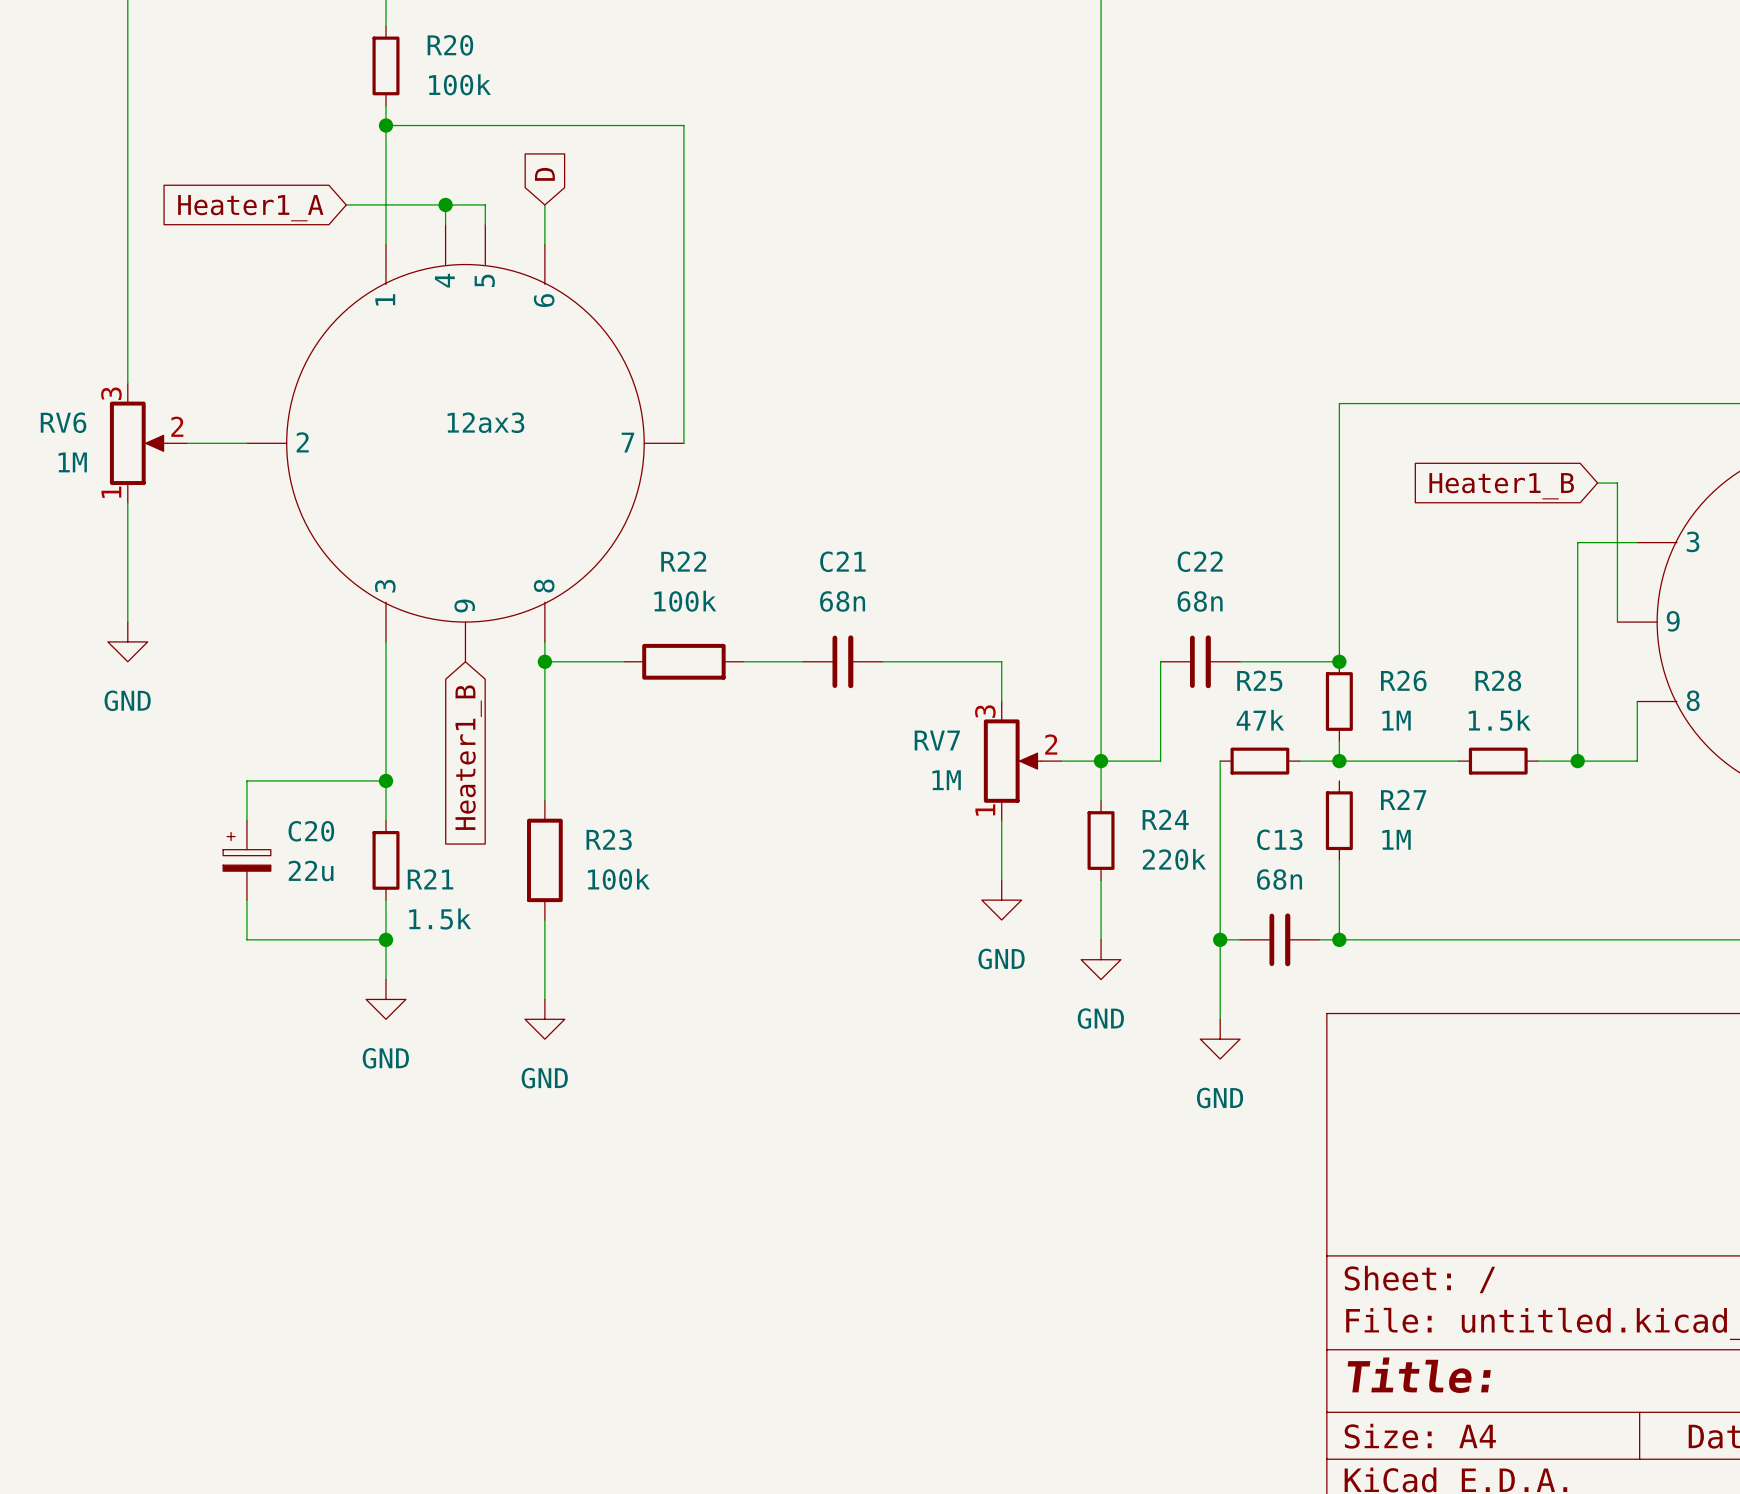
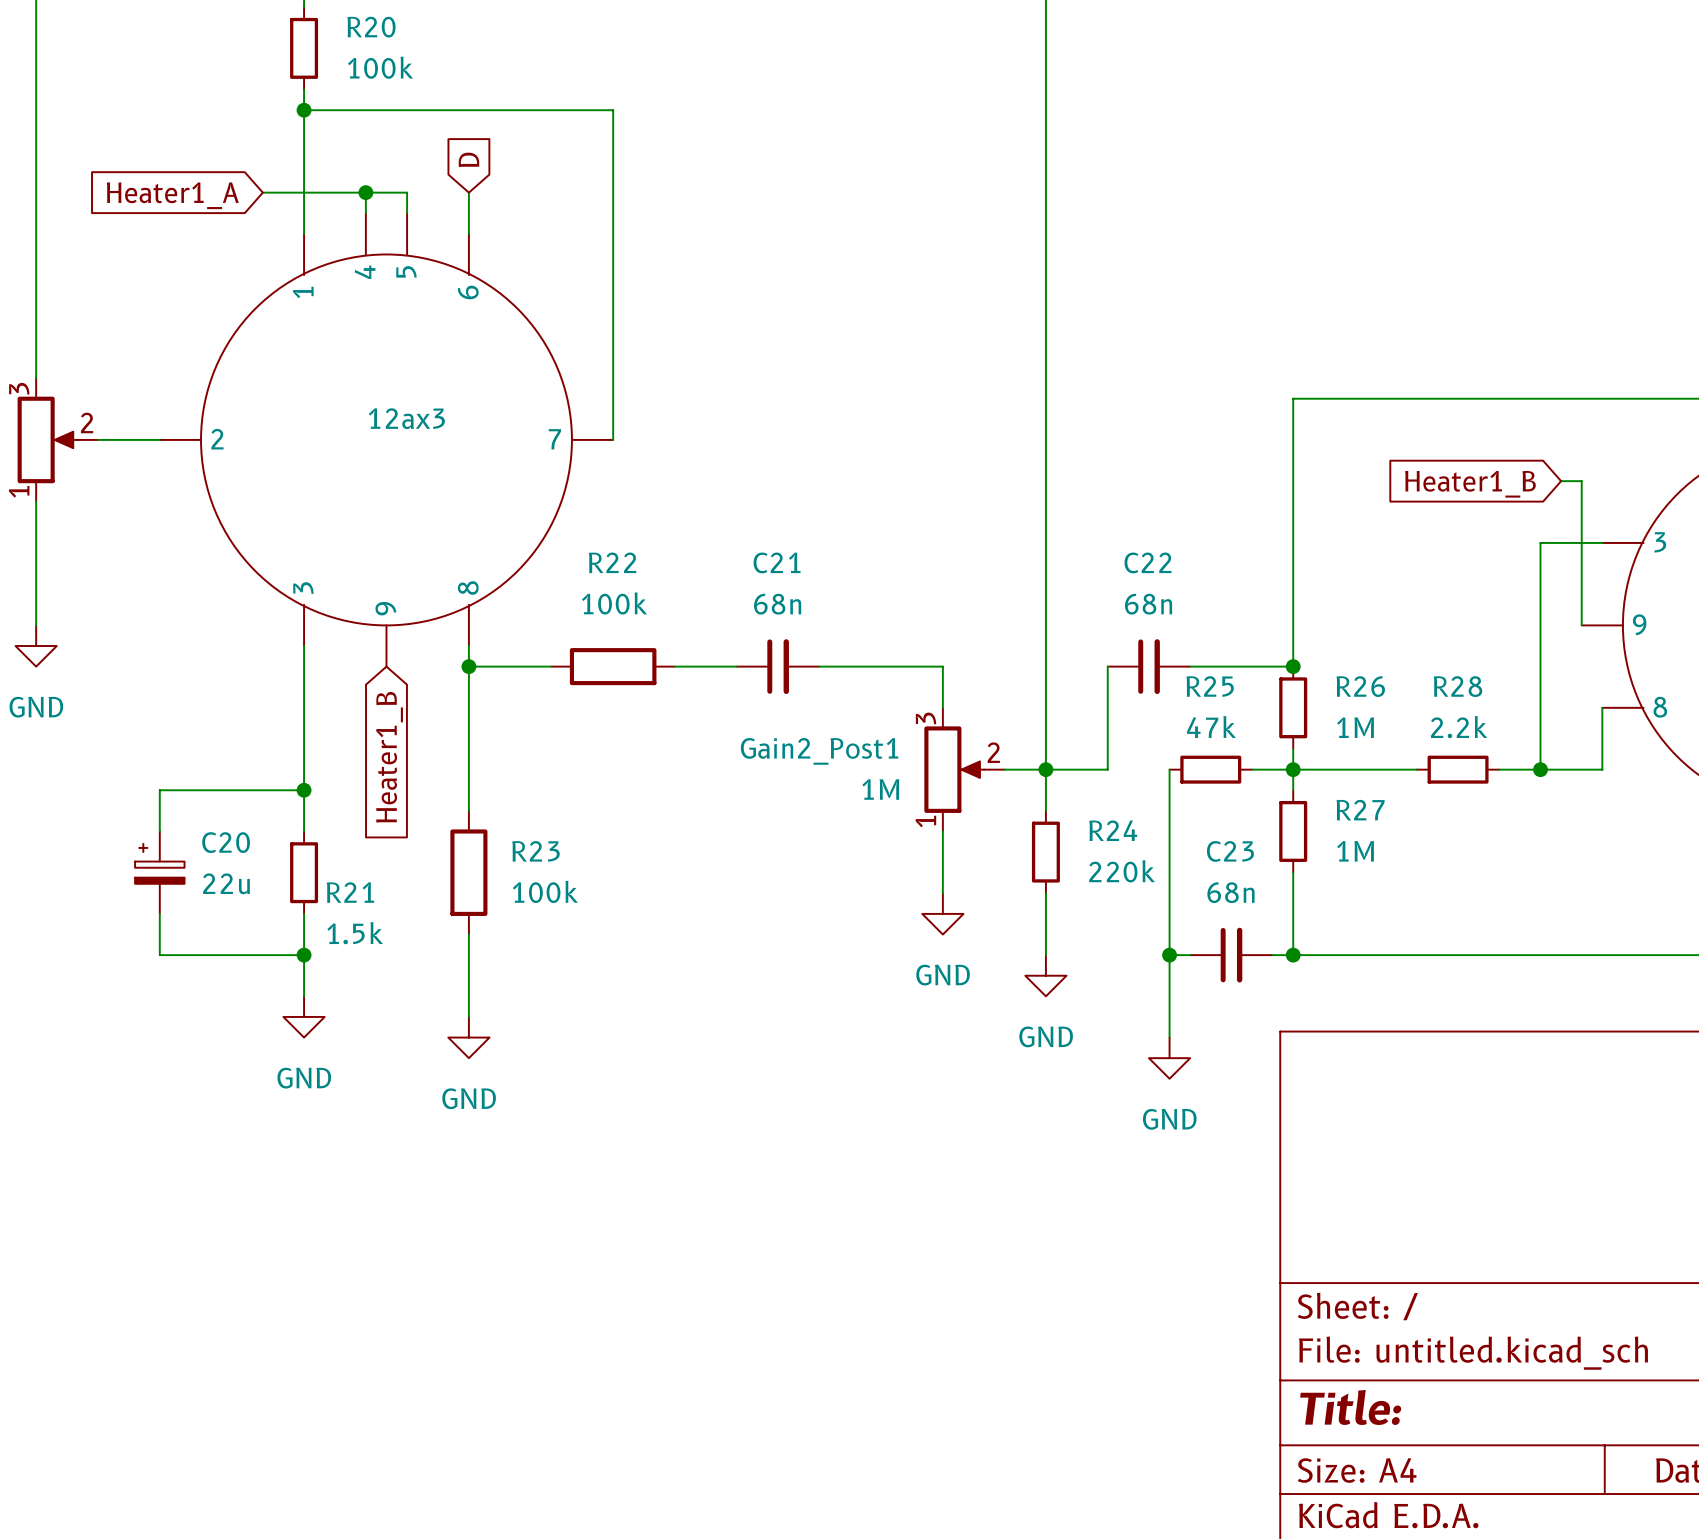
R28 value: 1.5k (1499, 720) -> 2.2k (1459, 727)
RV7 name: RV7 (937, 740) -> Gain2_Post1 (819, 751)
wire: none -> (1293, 769) (1293, 790)
C13 name: C13 (1279, 839) -> C23 (1230, 851)

